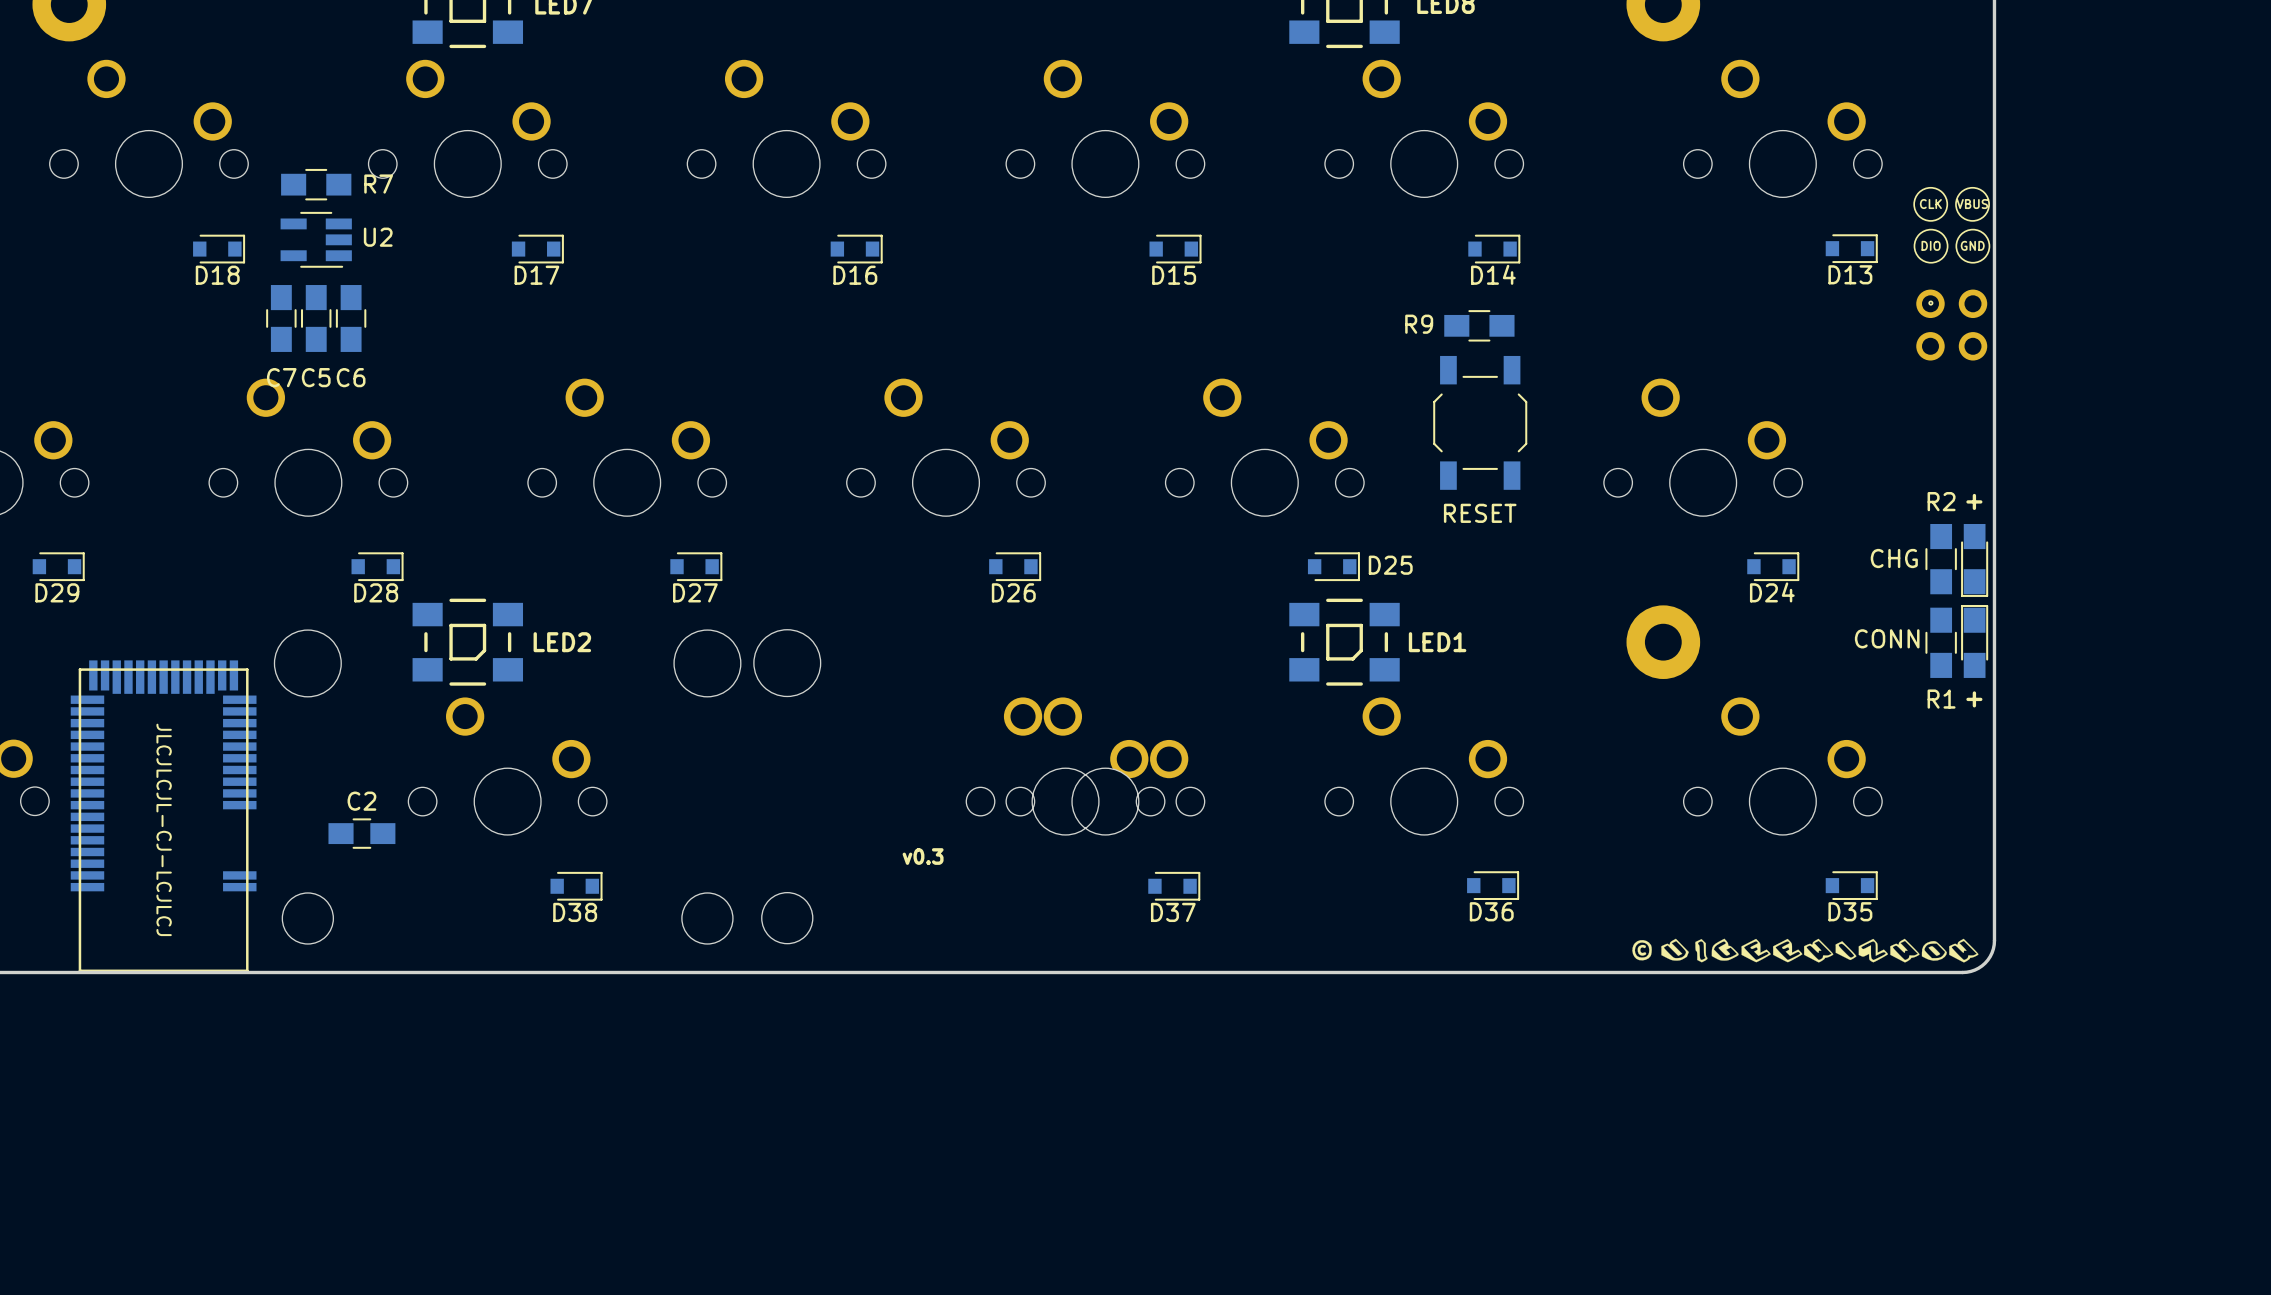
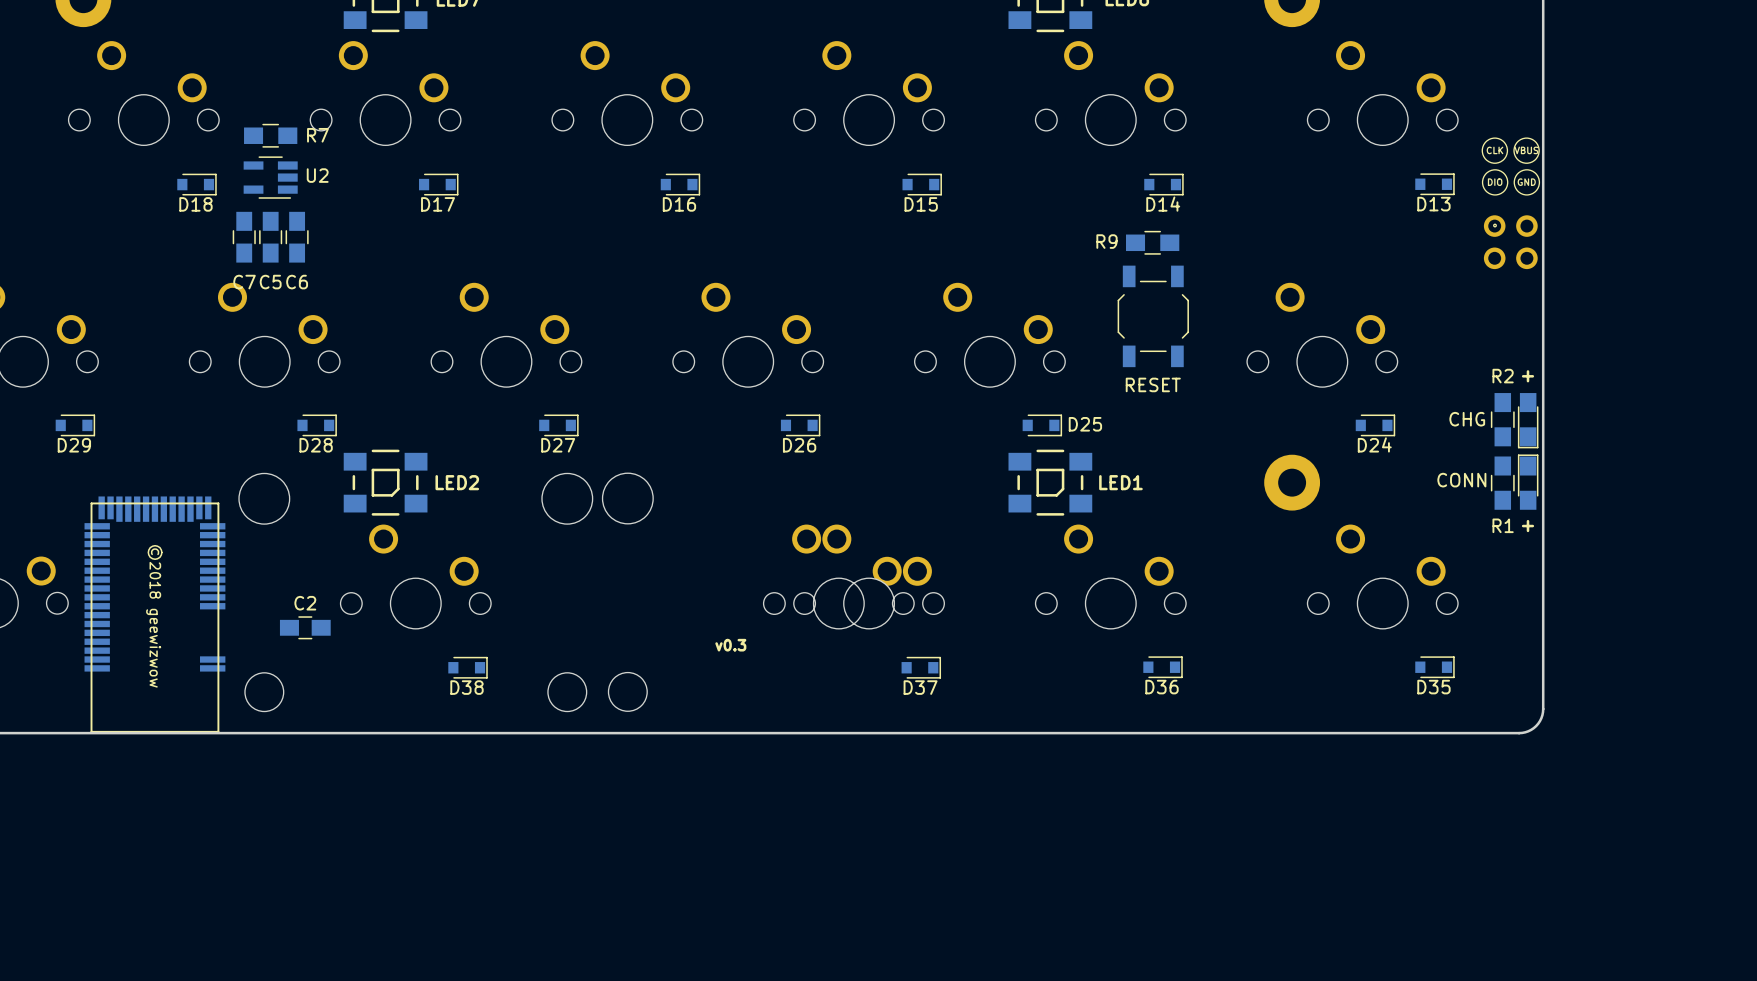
text: JLCJLCJL-CJ-LCJLCJ (164, 829) -> ©2018 geewizwow (154, 616)
drawing: [1632, 938, 1979, 963] -> none

